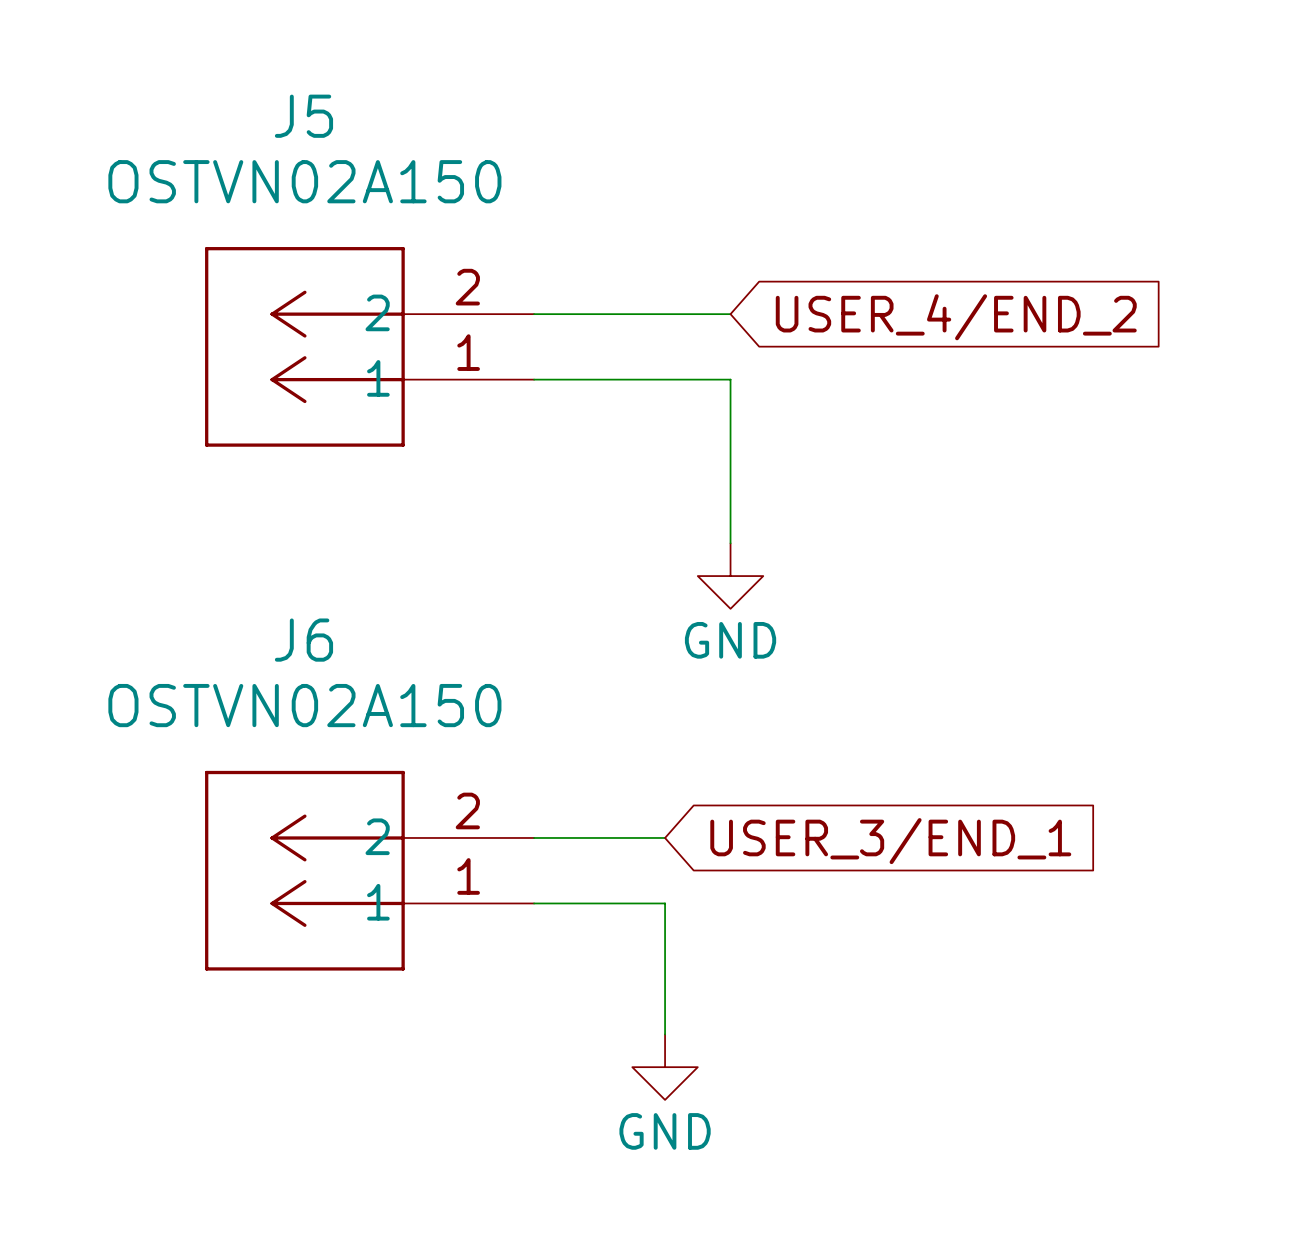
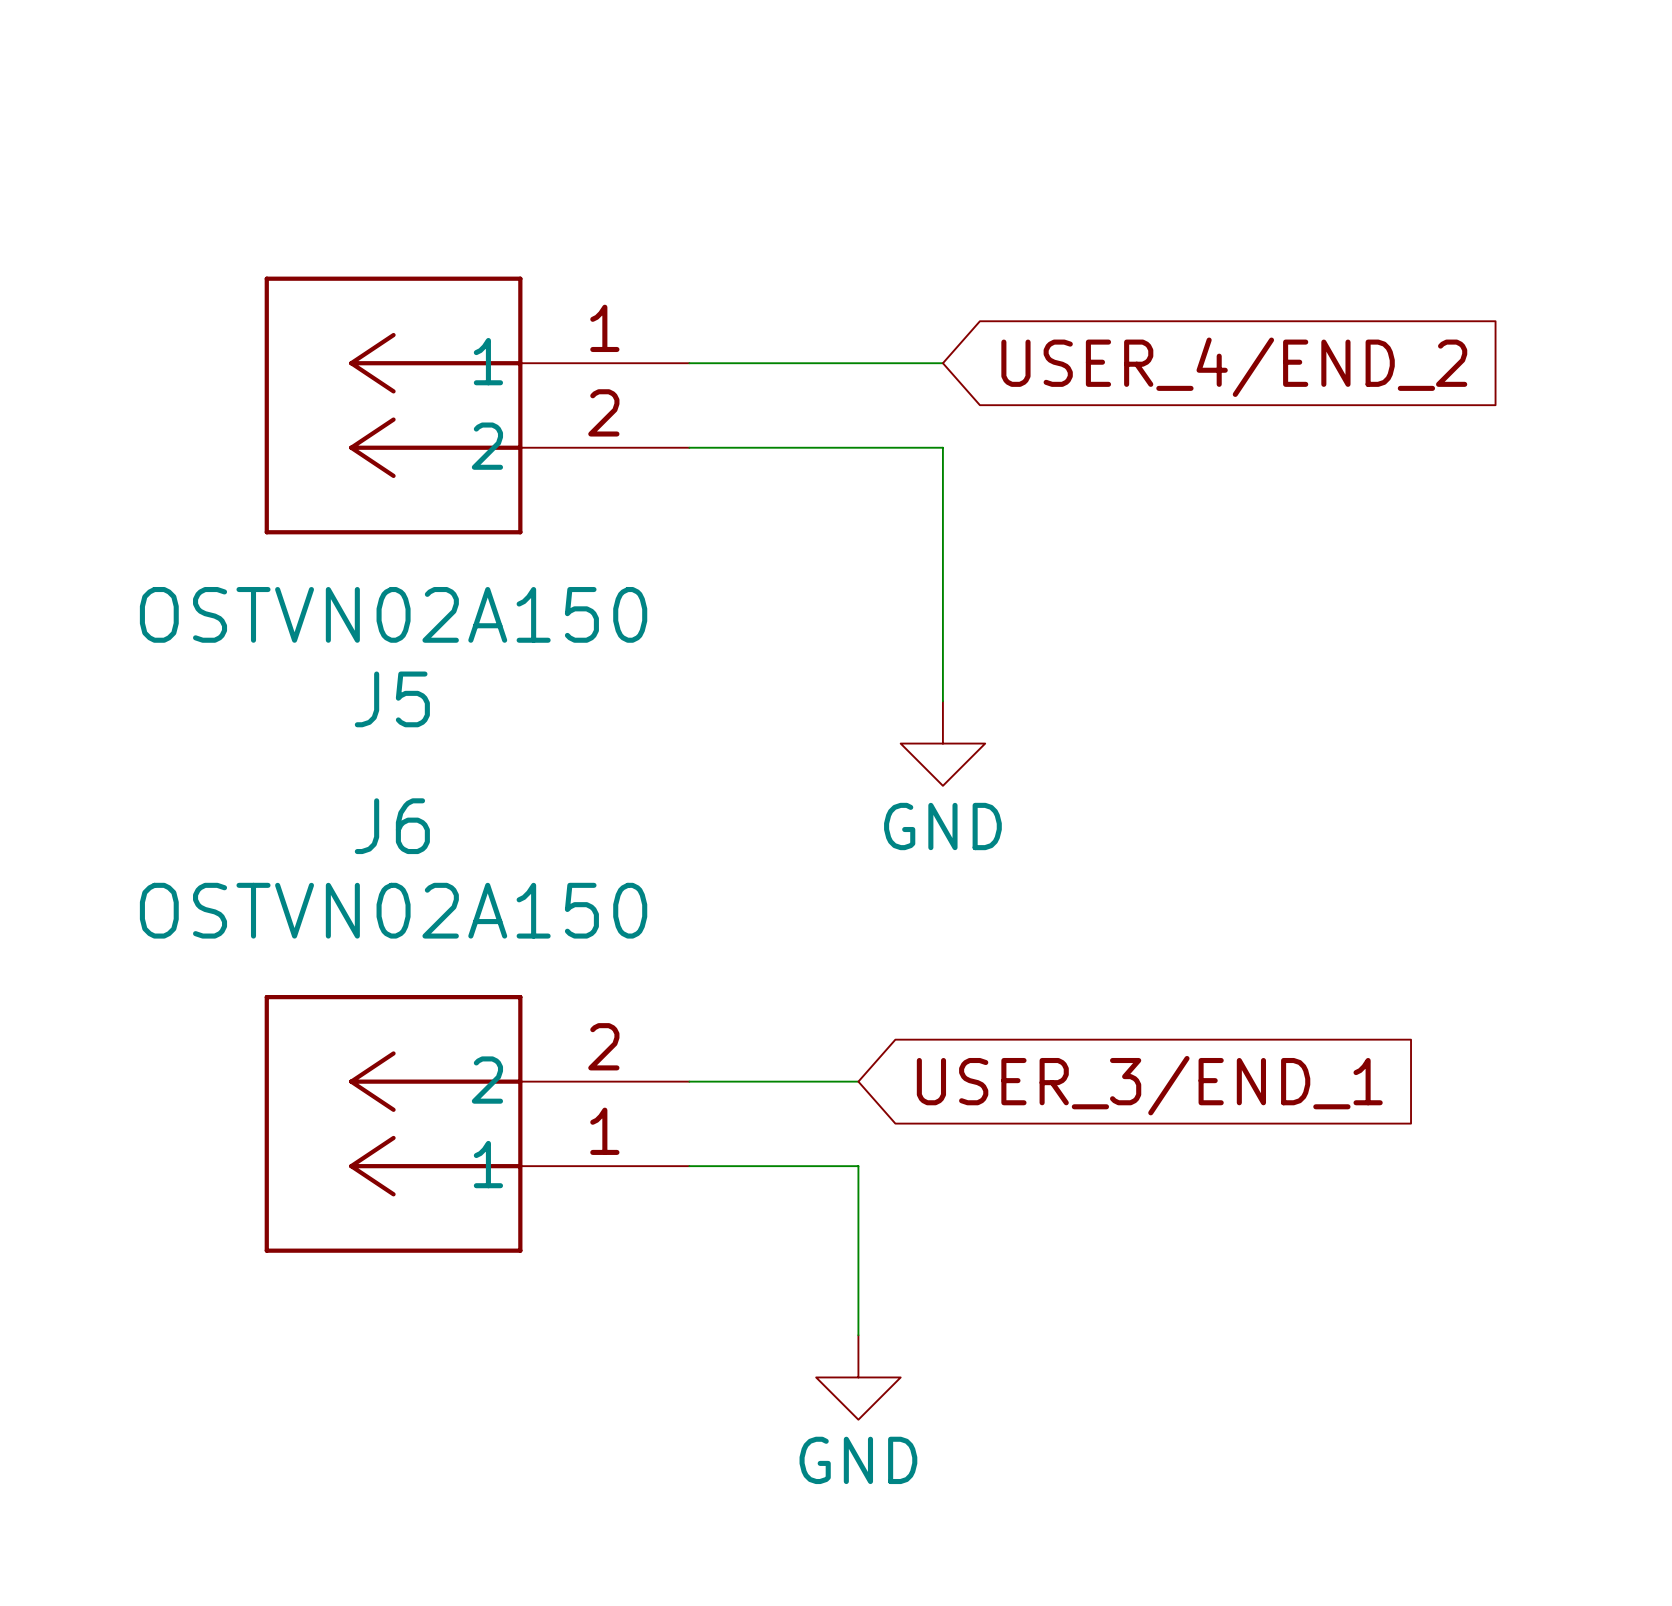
wire: (534, 314) (730, 314) -> (689, 363) (942, 363)
global label position: USER_4/END_2 (956, 317) -> USER_4/END_2 (1234, 367)
J5 flip: as is (304, 346) -> up-down (393, 405)
wire: (534, 379) (730, 379) -> (689, 447) (942, 447) (942, 490)

